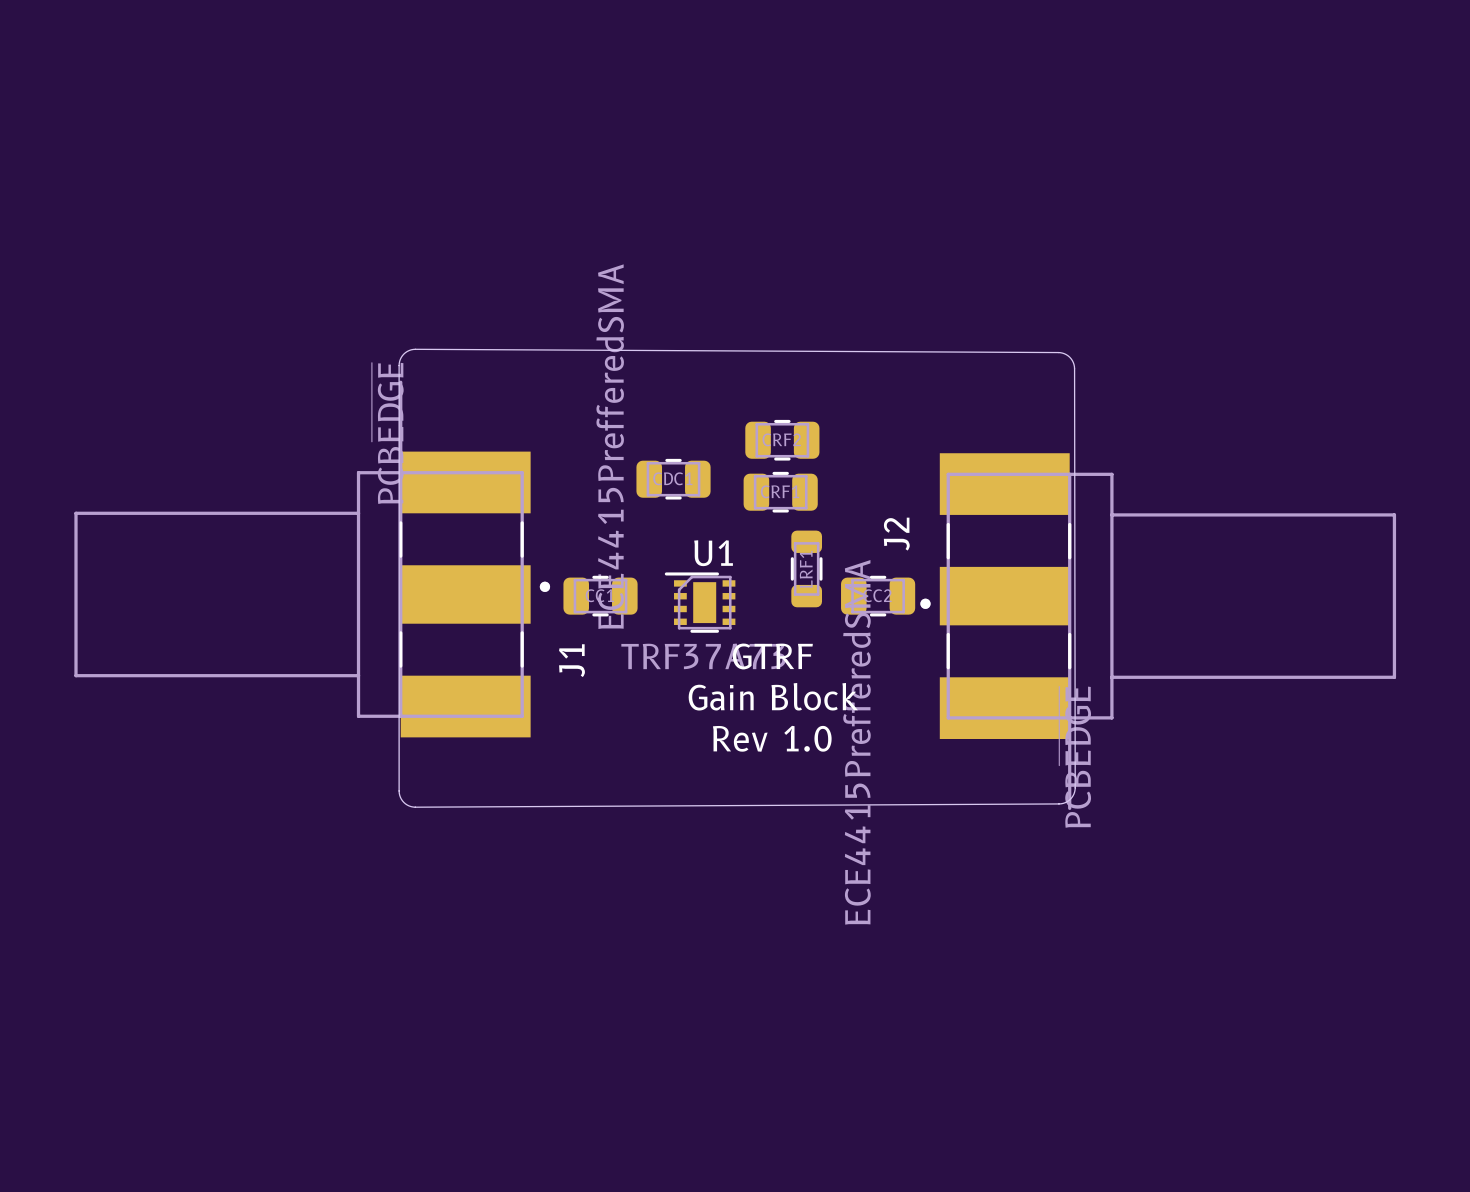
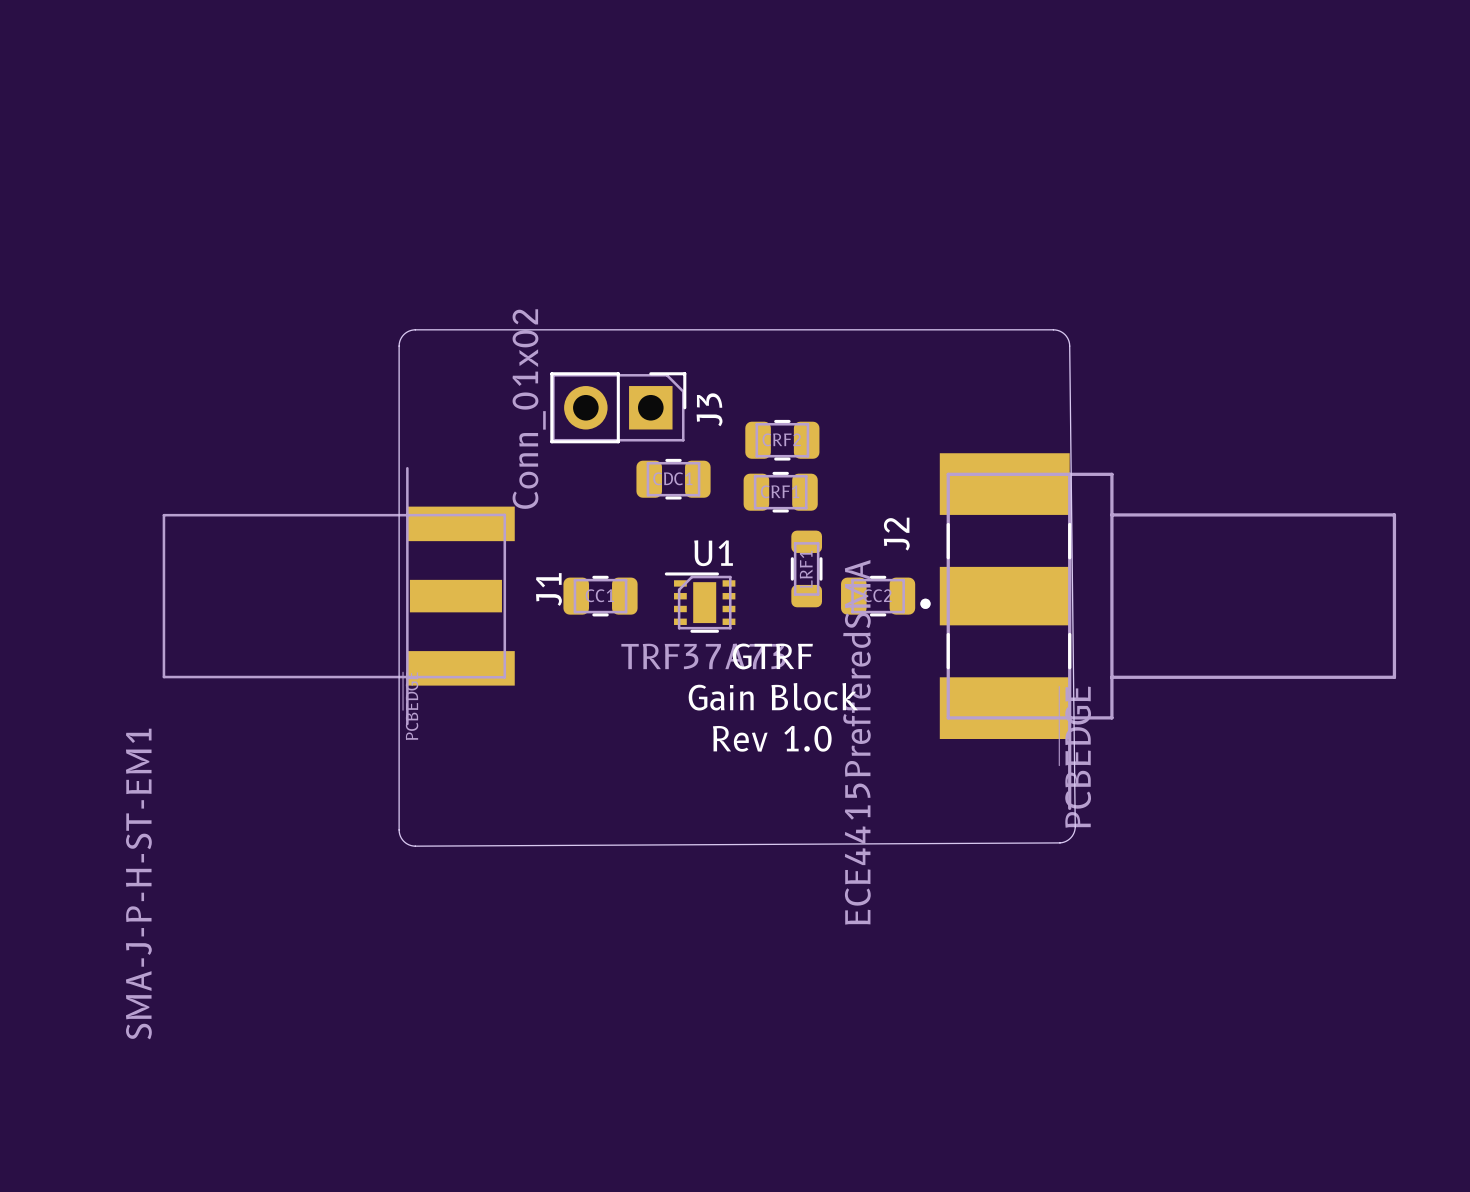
board edge: (399, 365) (403, 354) (415, 349) (1058, 352) (1066, 354) (1072, 360) (1074, 368) (1075, 787) (1070, 799) (1058, 803) (415, 807) (403, 802) (399, 790) -> (399, 365) (400, 339) (407, 332) (415, 329) (1053, 329) (1063, 333) (1068, 339) (1069, 346) (1075, 826) (1070, 837) (1059, 842) (415, 846) (405, 842) (399, 834) (399, 790)
J1 footprint: [74, 380, 551, 738] -> [162, 466, 515, 726]
J3: none -> Conn_01x02 (618, 407)
J1 value: ECE4415PrefferedSMA (610, 446) -> SMA-J-P-H-ST-EM1 (138, 884)
J1 name position: J1 (572, 660) -> J1 (548, 589)

